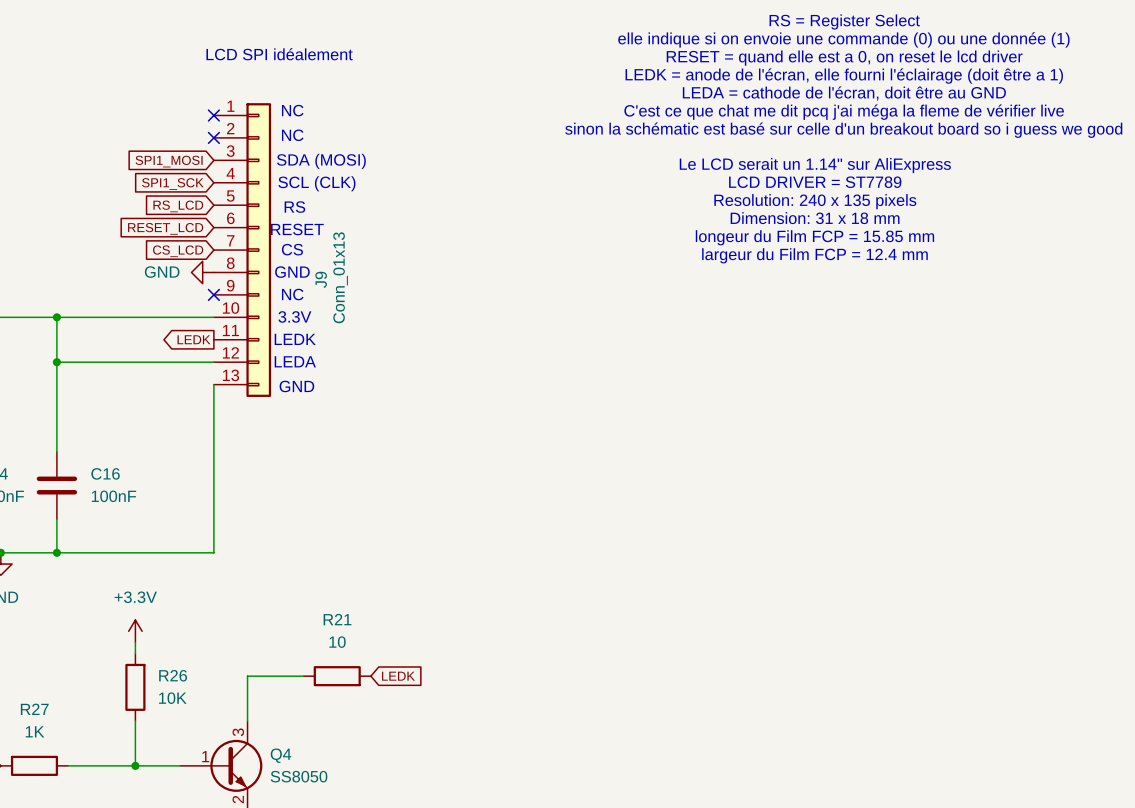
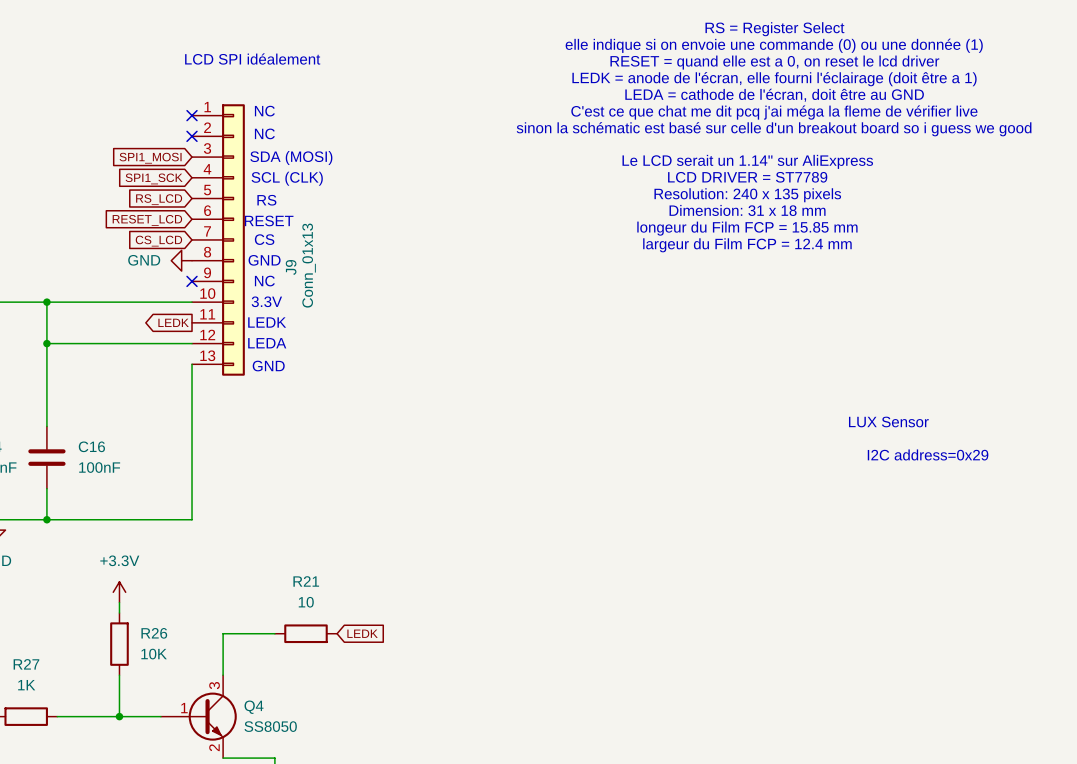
text: none -> LUX Sensor (888, 421)
text: none -> I2C address=0x29 (928, 454)

